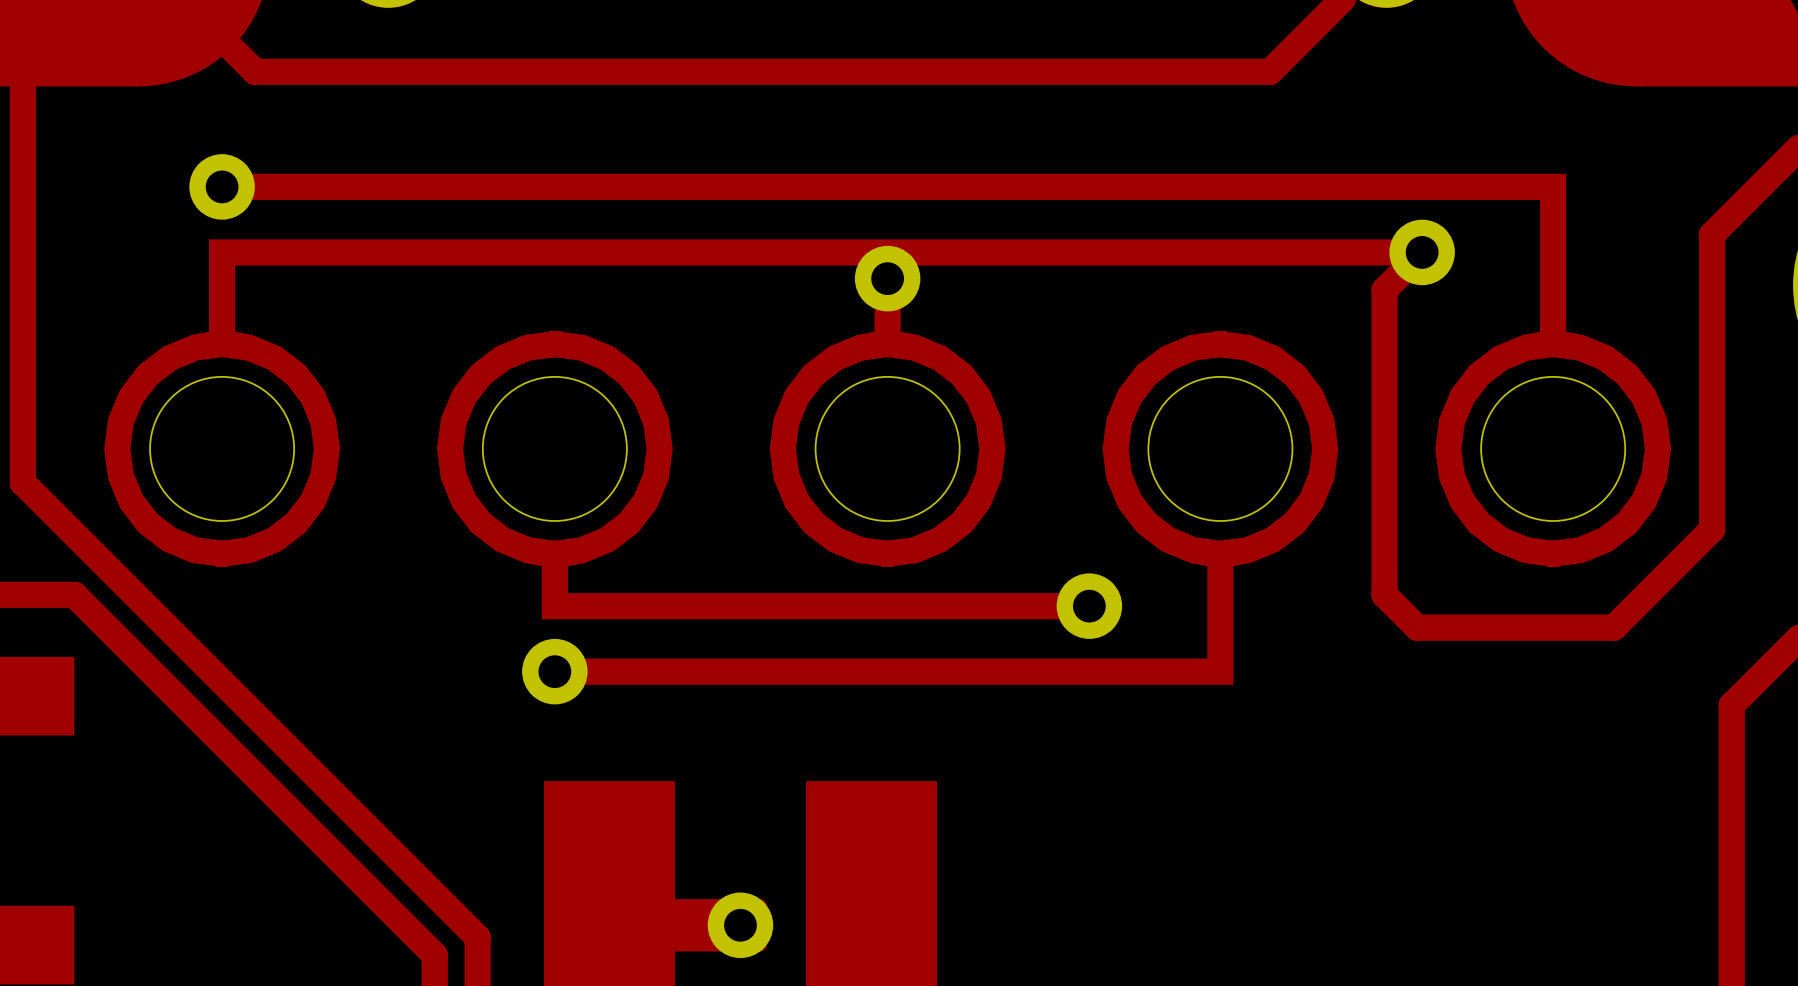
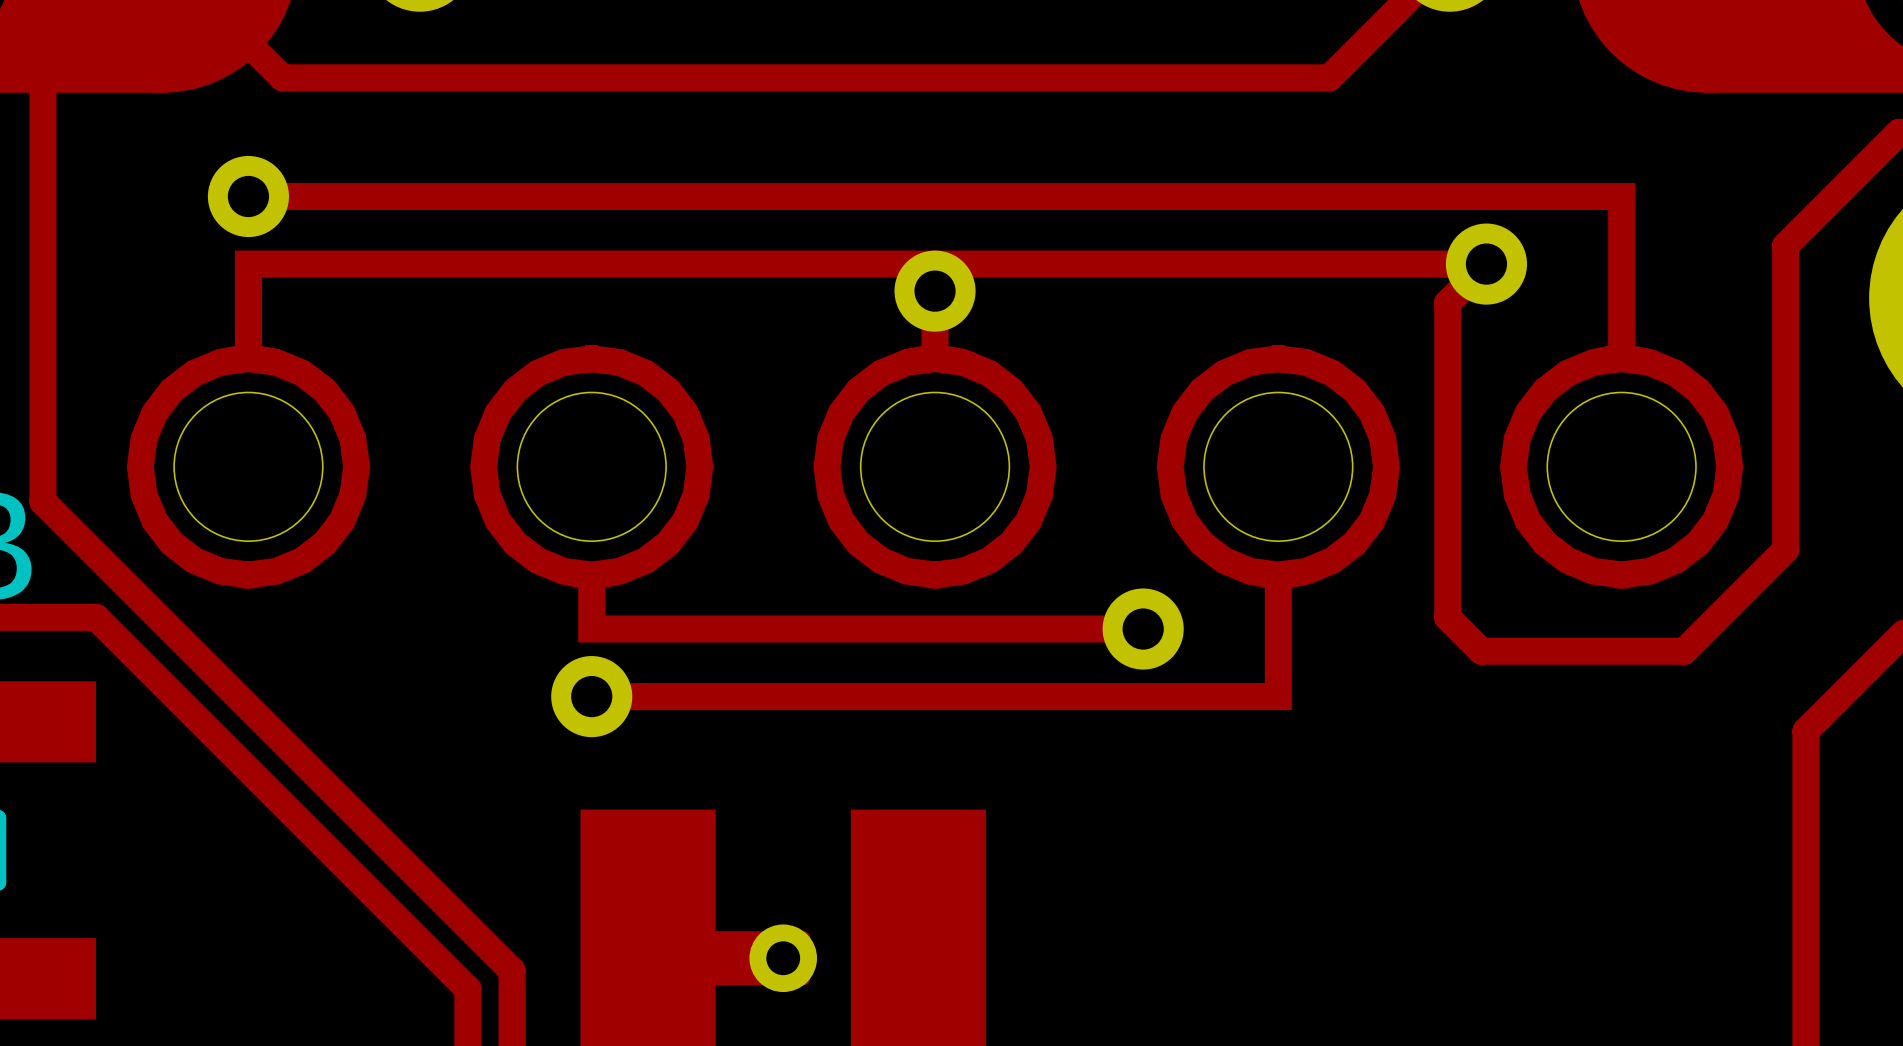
part footprint: [104, 154, 1672, 705] -> [126, 155, 1744, 738]

